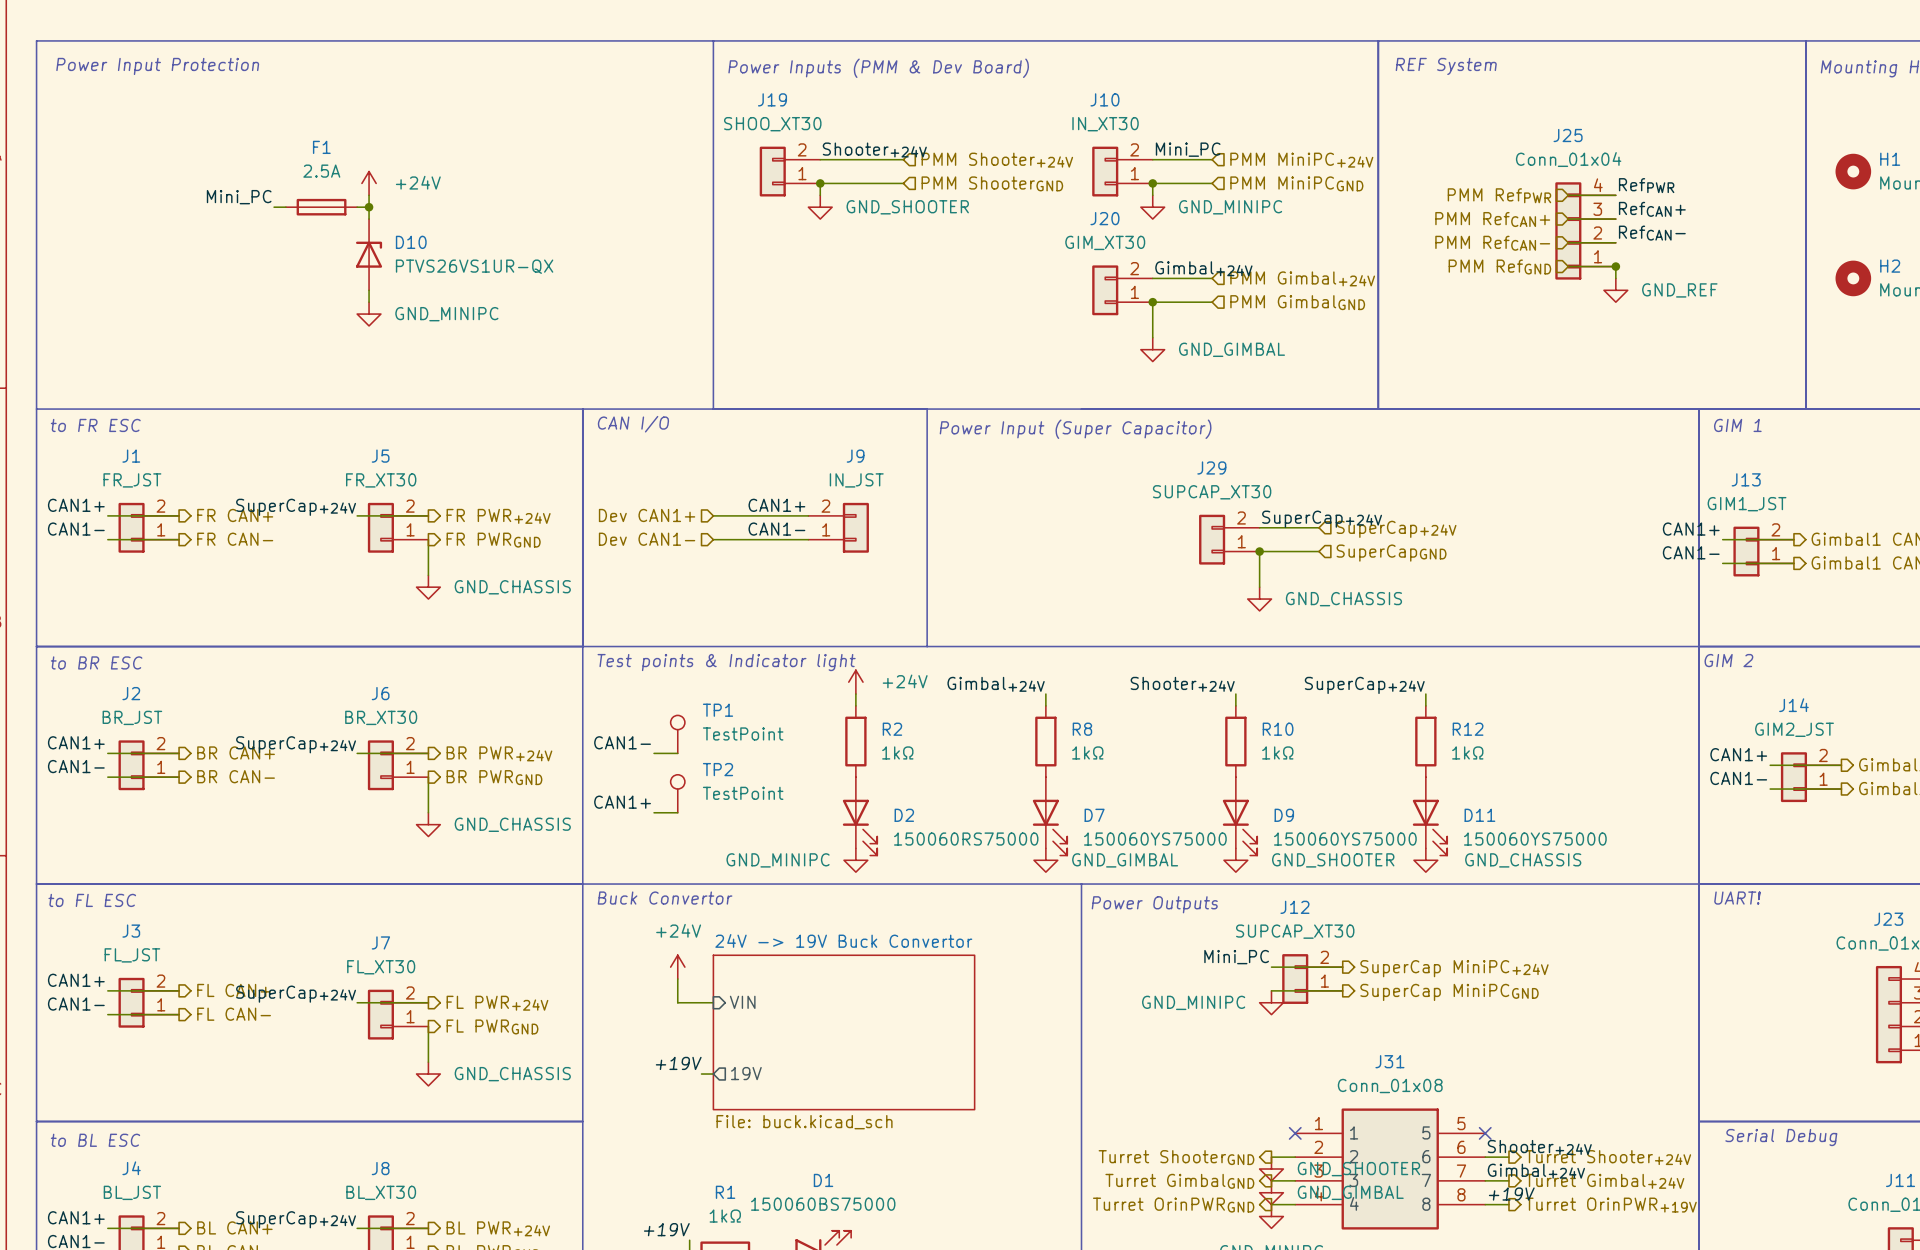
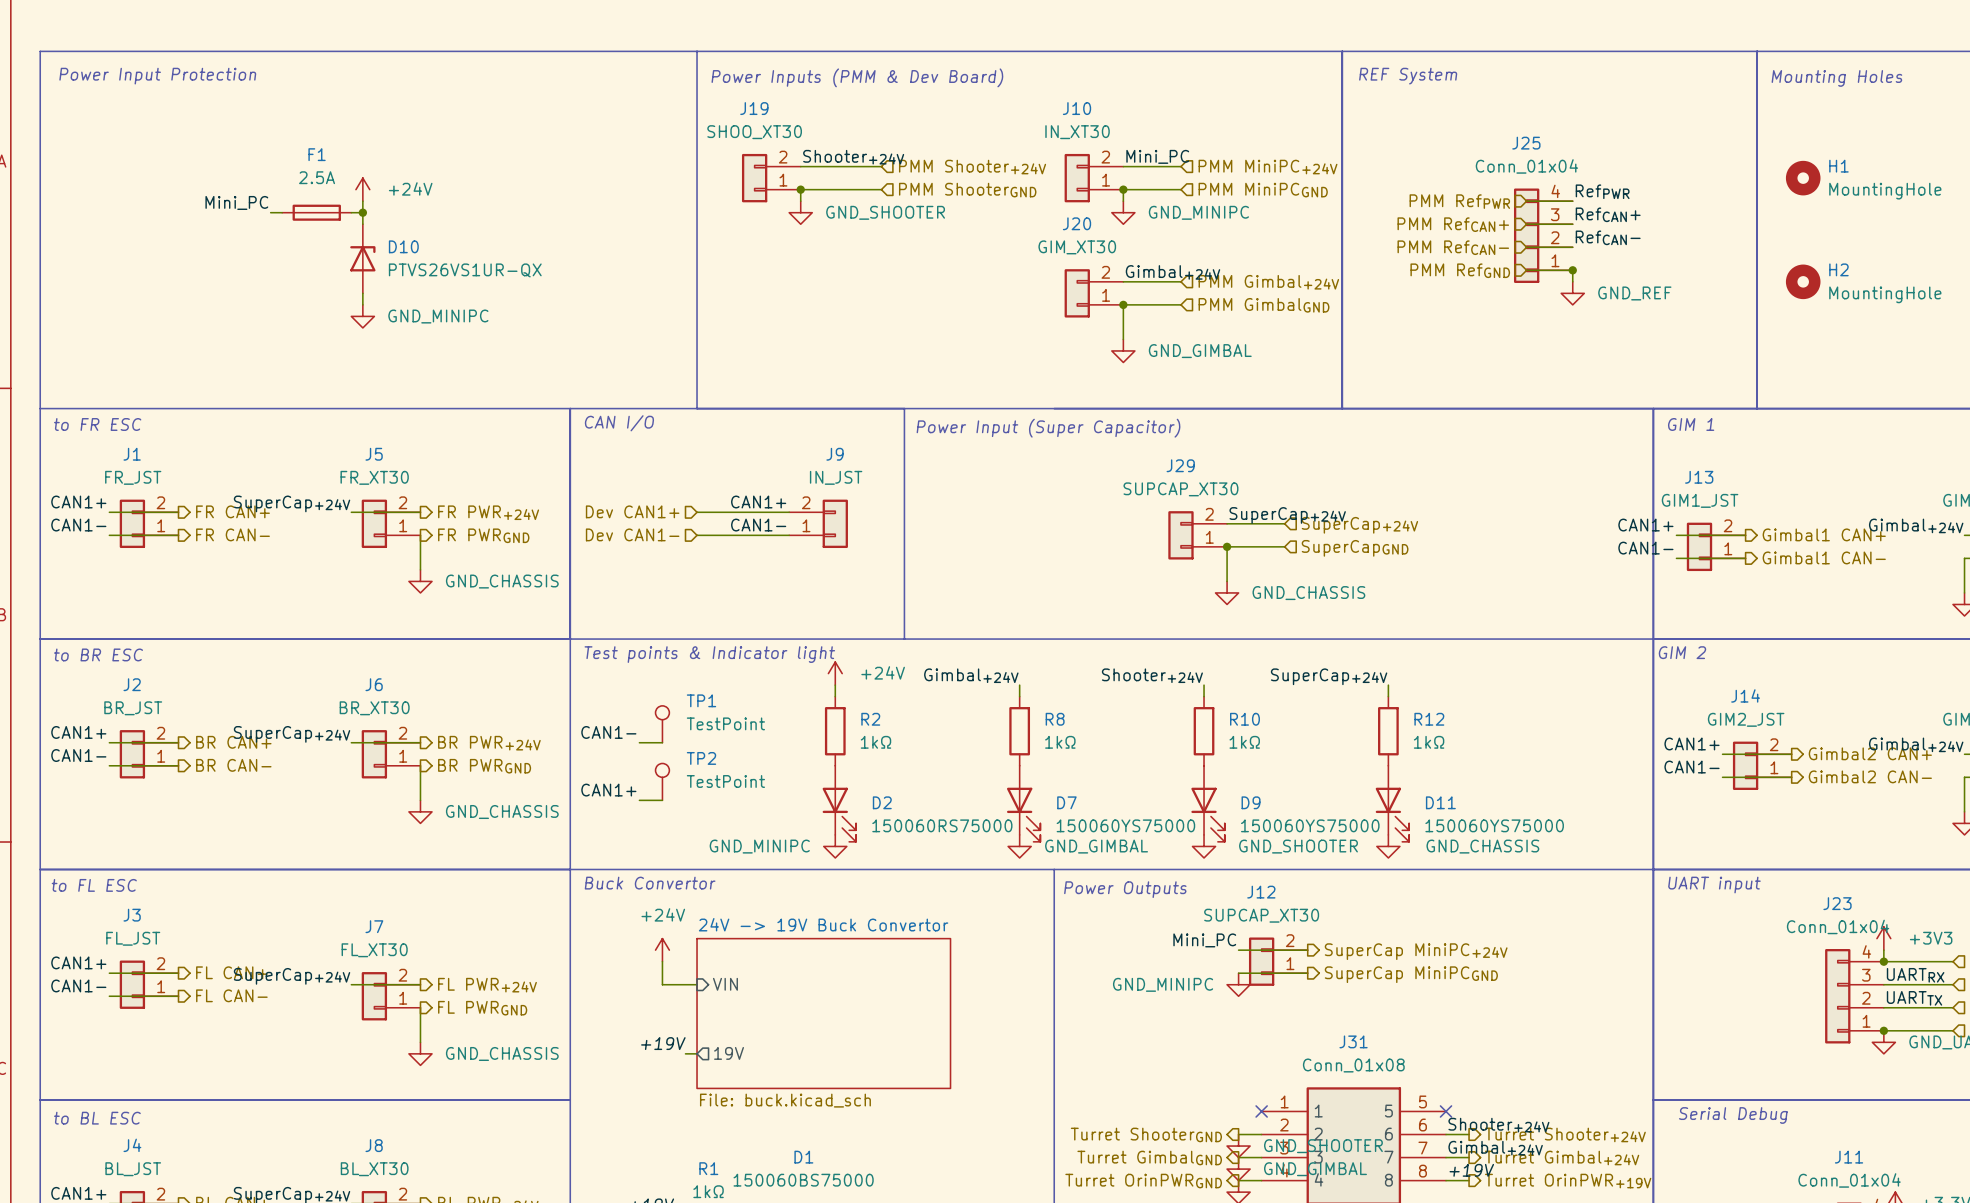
text: UART! (1737, 898) -> UART input (1714, 885)

